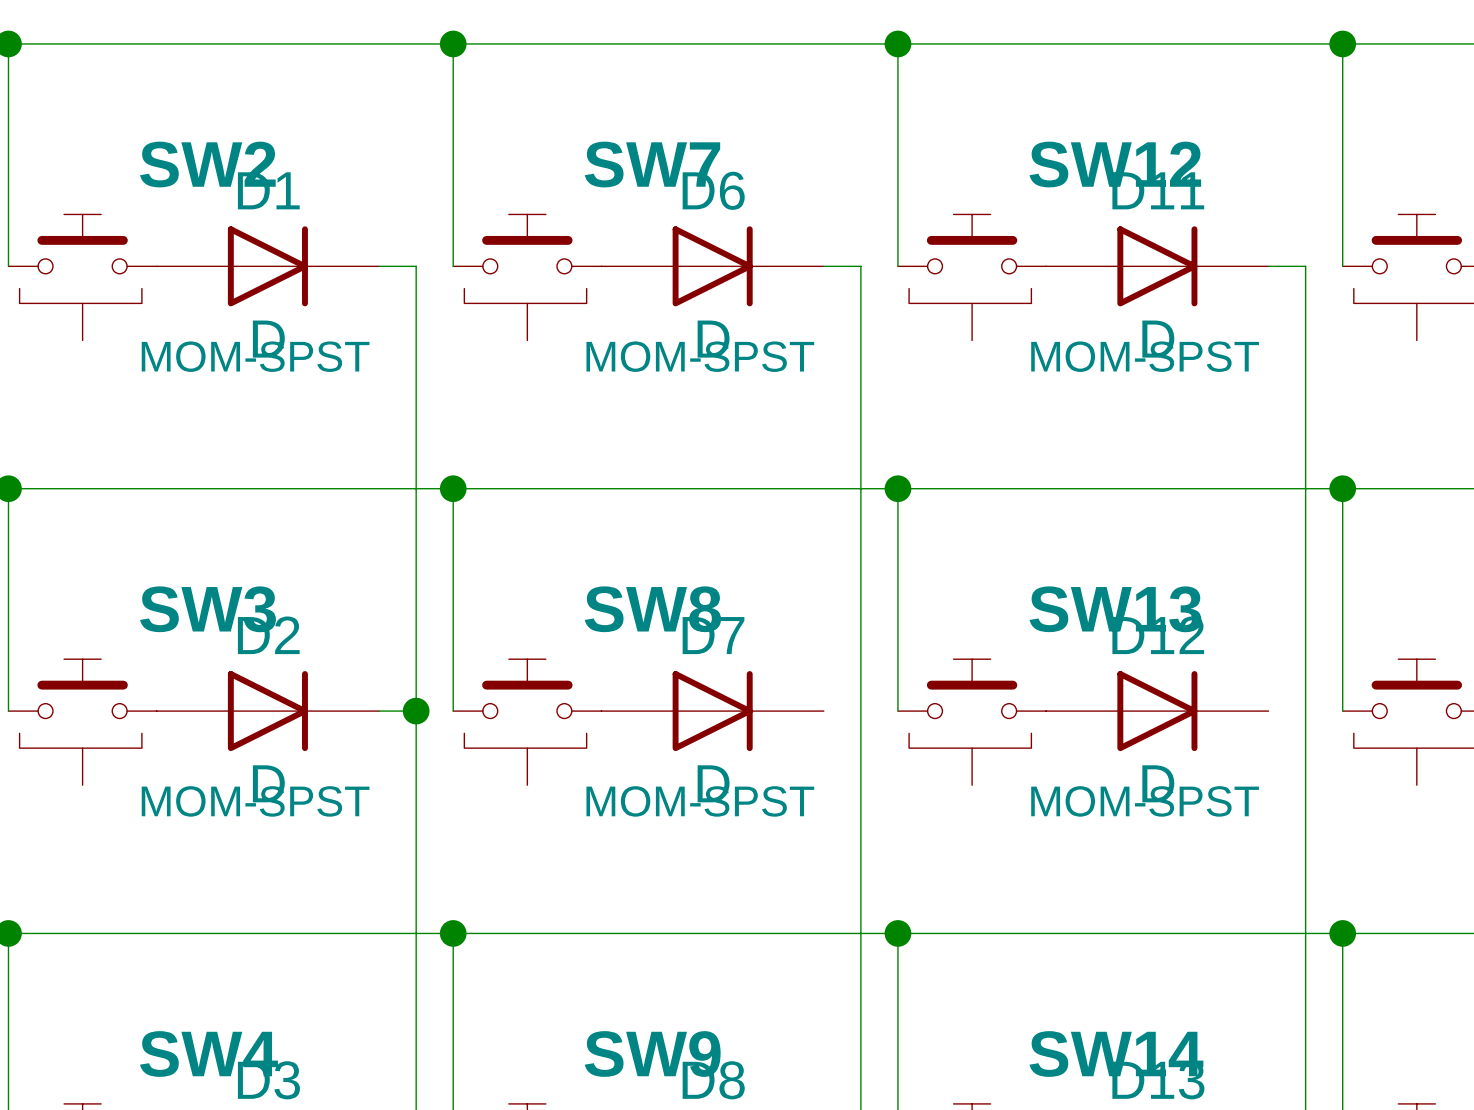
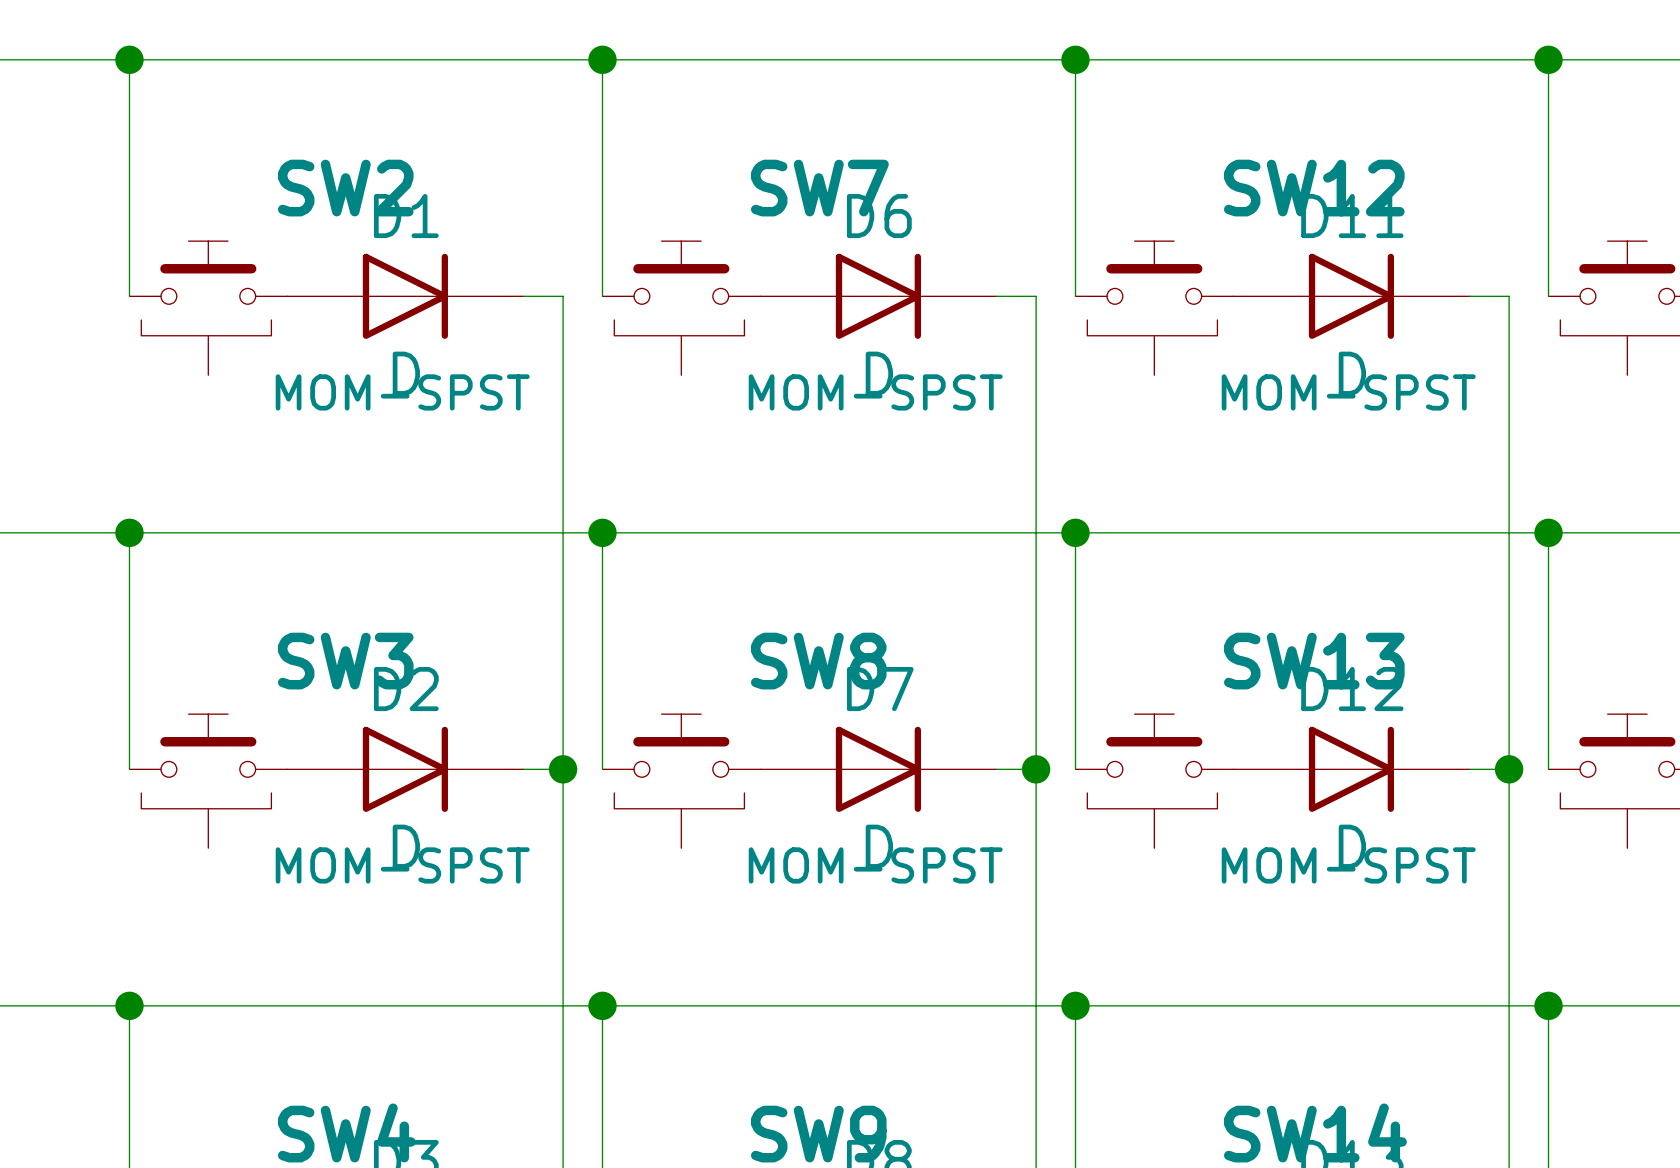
wire: none -> (996, 769) (1036, 769)
junction: none -> (1036, 769)
wire: none -> (1469, 769) (1509, 769)
junction: none -> (1509, 769)

